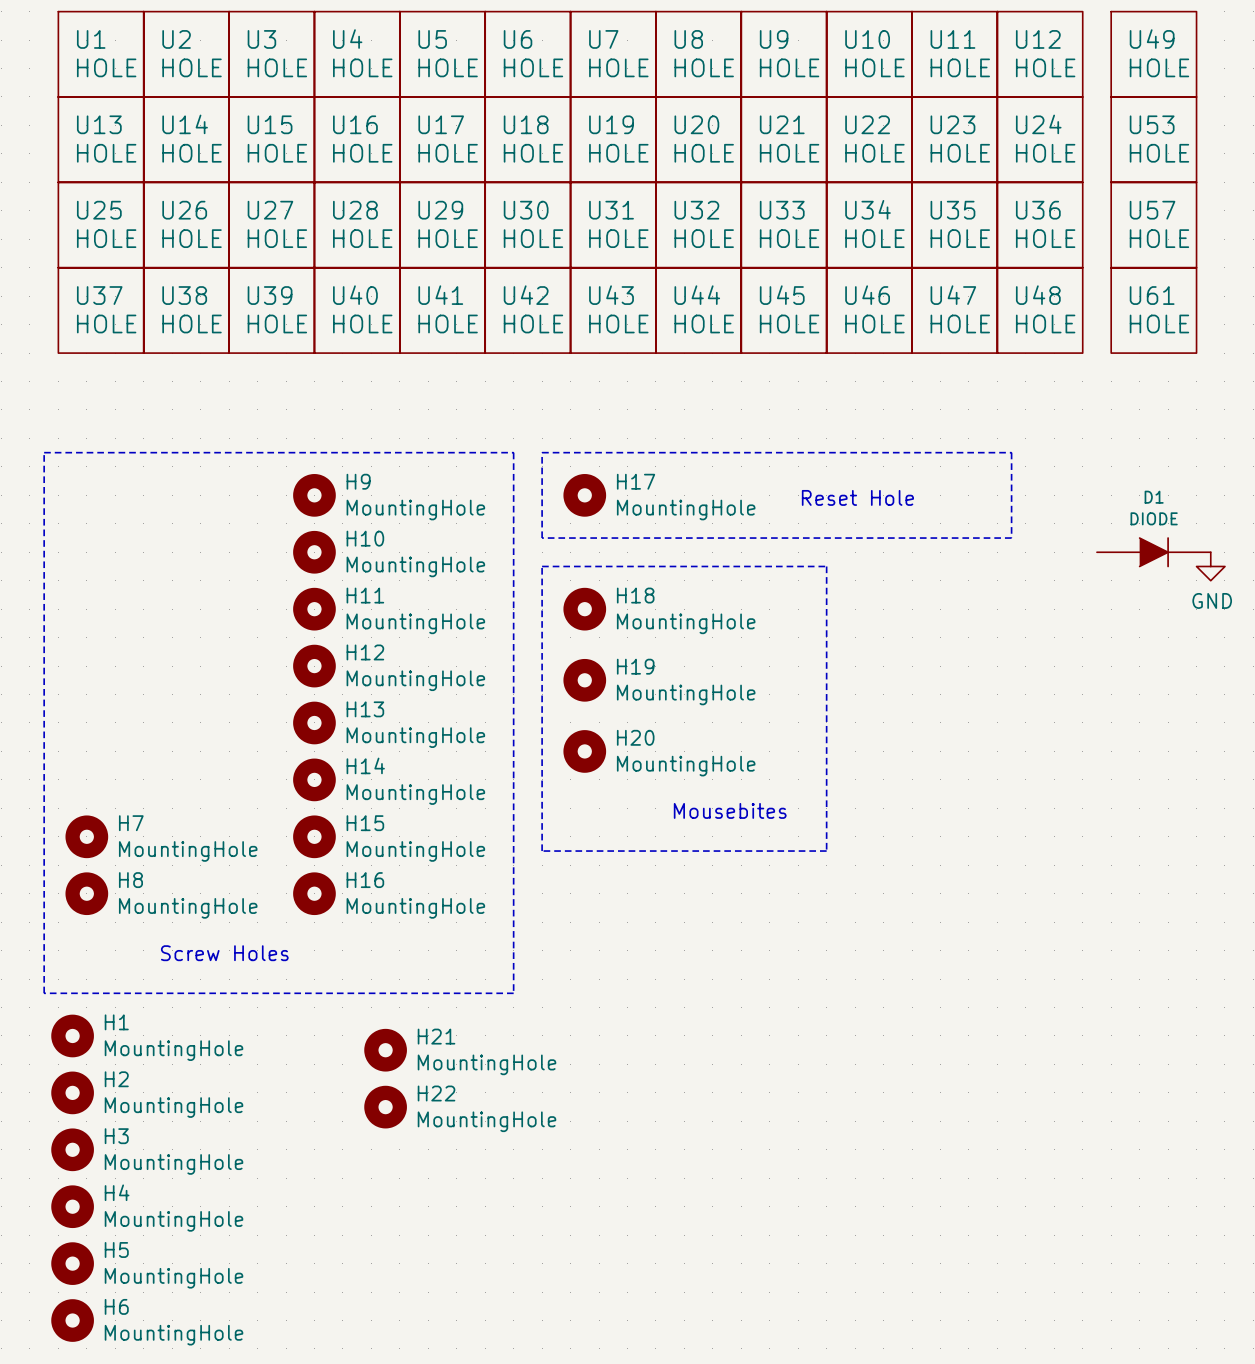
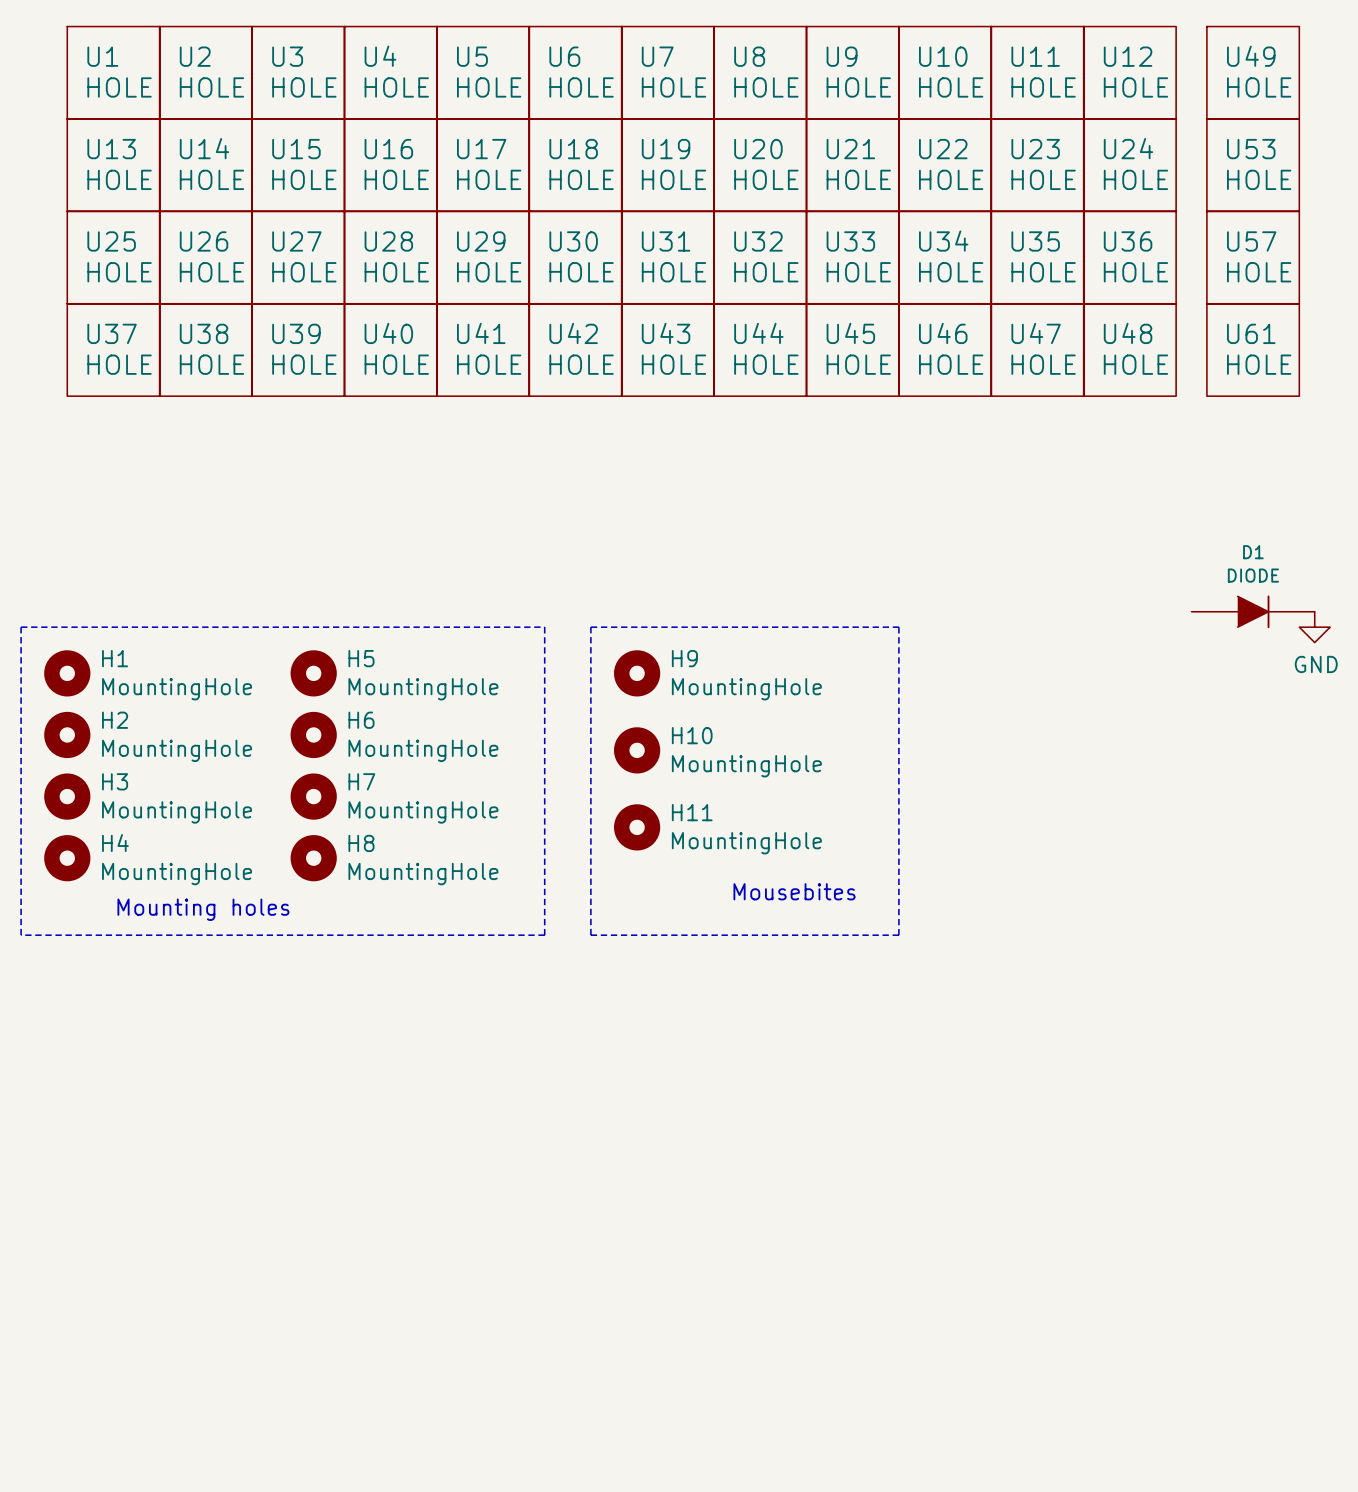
line: (44, 452) (513, 452) (513, 993) (44, 993) (44, 452) -> none
line: (542, 452) (1011, 452) (1011, 538) (542, 538) (542, 452) -> none
H9: MountingHole (314, 495) -> none
H17: MountingHole (584, 495) -> none
text: Reset Hole (857, 497) -> none
H10: MountingHole (314, 552) -> none
line: none -> (21, 627) (544, 627) (544, 935) (21, 935) (21, 627)
H18 name: H18 (635, 595) -> H9 (684, 658)
H11: MountingHole (314, 609) -> none
H12: MountingHole (314, 666) -> none
H19 name: H19 (635, 666) -> H10 (692, 735)
H13: MountingHole (314, 722) -> none
H20 name: H20 (635, 737) -> H11 (692, 812)
H14: MountingHole (314, 779) -> none
text: none -> Mounting holes (203, 909)
H7 position: (86, 836) -> (313, 796)
H15: MountingHole (314, 836) -> none
H8 position: (86, 893) -> (313, 858)
H16: MountingHole (314, 893) -> none
text: Screw Holes (224, 953) -> none
H1 position: (72, 1035) -> (67, 673)
H21: MountingHole (385, 1050) -> none
H2 position: (72, 1092) -> (67, 734)
H22: MountingHole (385, 1107) -> none
H3 position: (72, 1149) -> (67, 796)
H4 position: (72, 1206) -> (67, 858)
H5 position: (72, 1263) -> (313, 673)
H6 position: (72, 1320) -> (313, 734)

